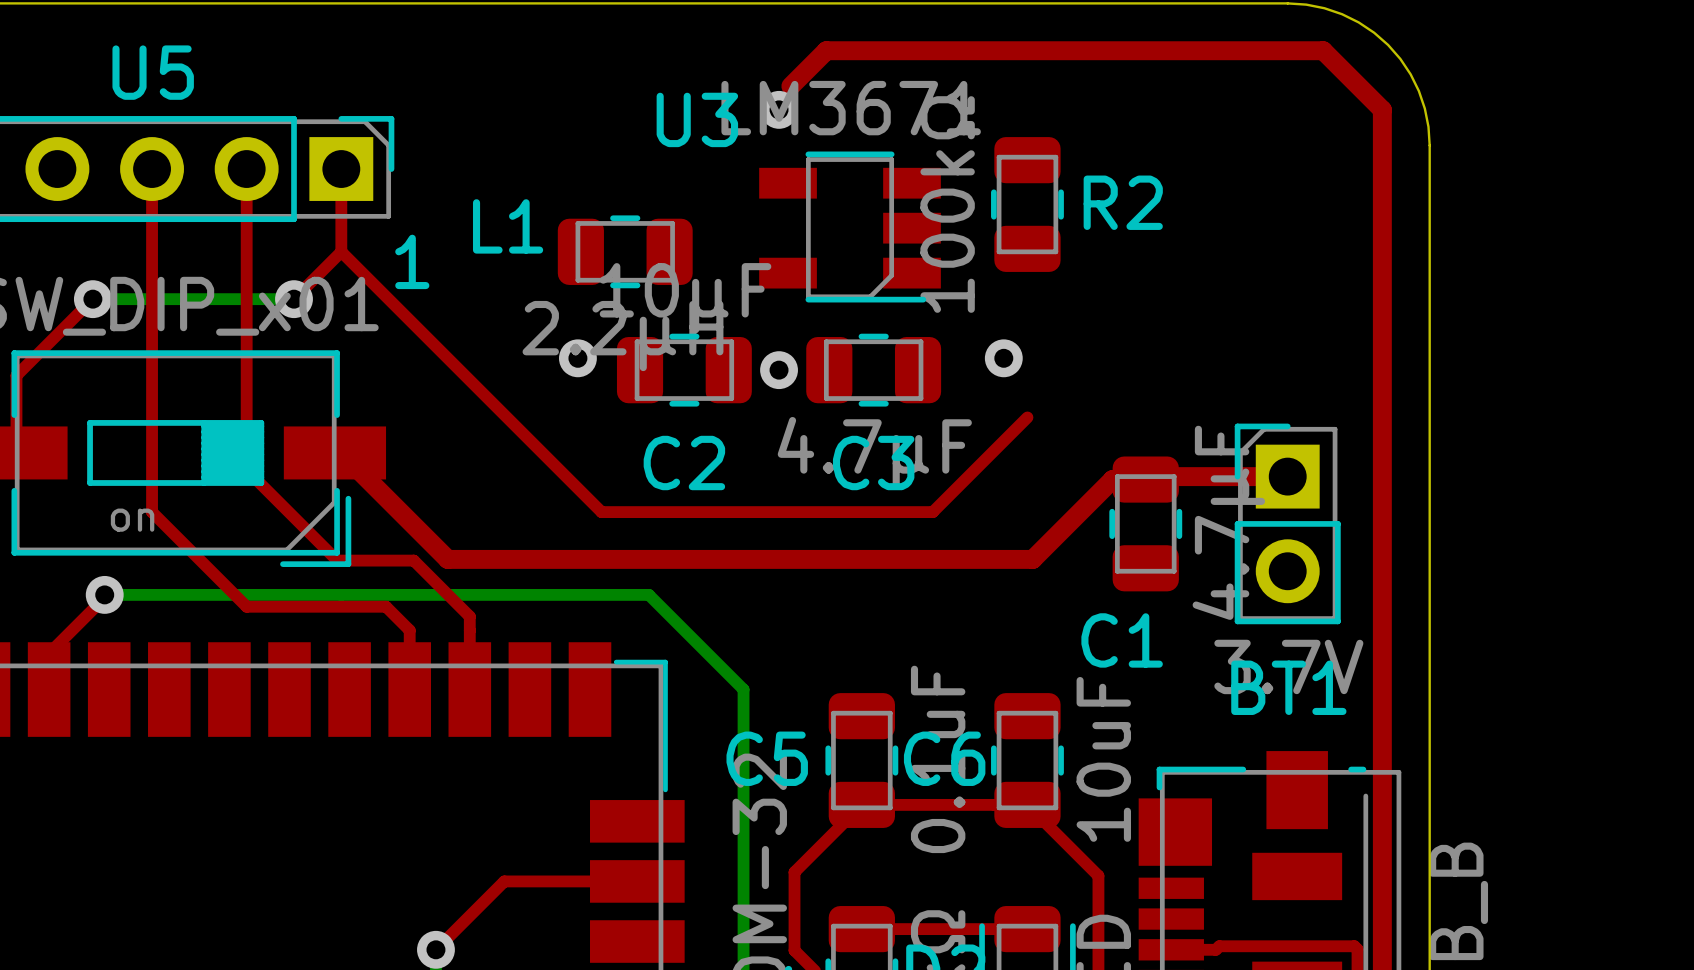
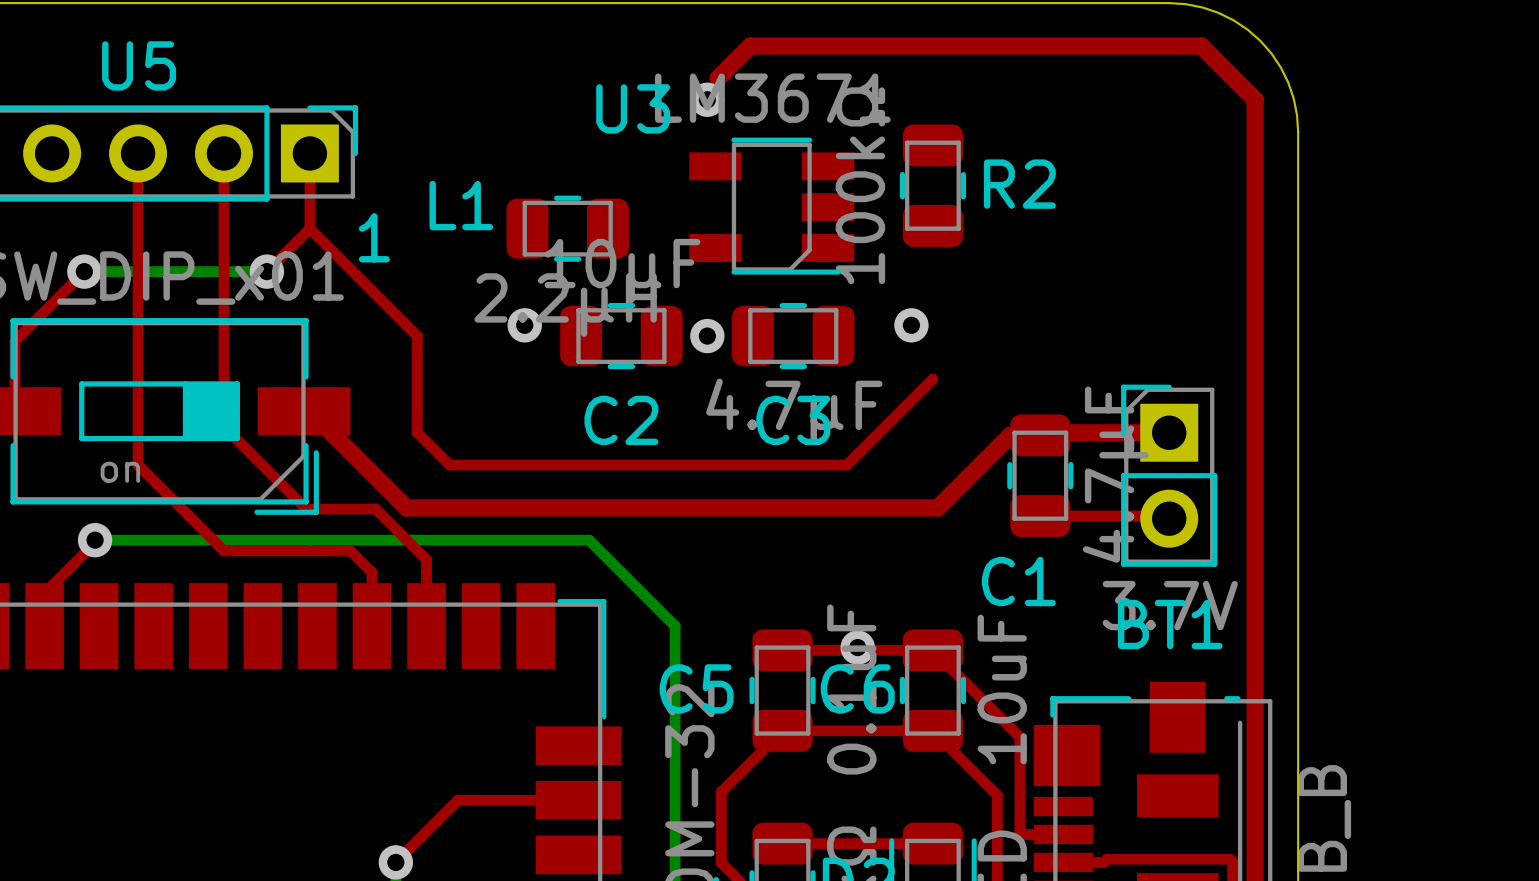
top track: (459, 370) (601, 512) -> (417, 336) (417, 432) (449, 464) (546, 464)
top track: none -> (1040, 515) (1166, 515) (1169, 518)
via: none -> (857, 647)
top track: none -> (782, 650) (855, 650) (857, 647) (860, 650) (932, 650) (1019, 737) (1019, 831) (1023, 834) (1063, 834)

